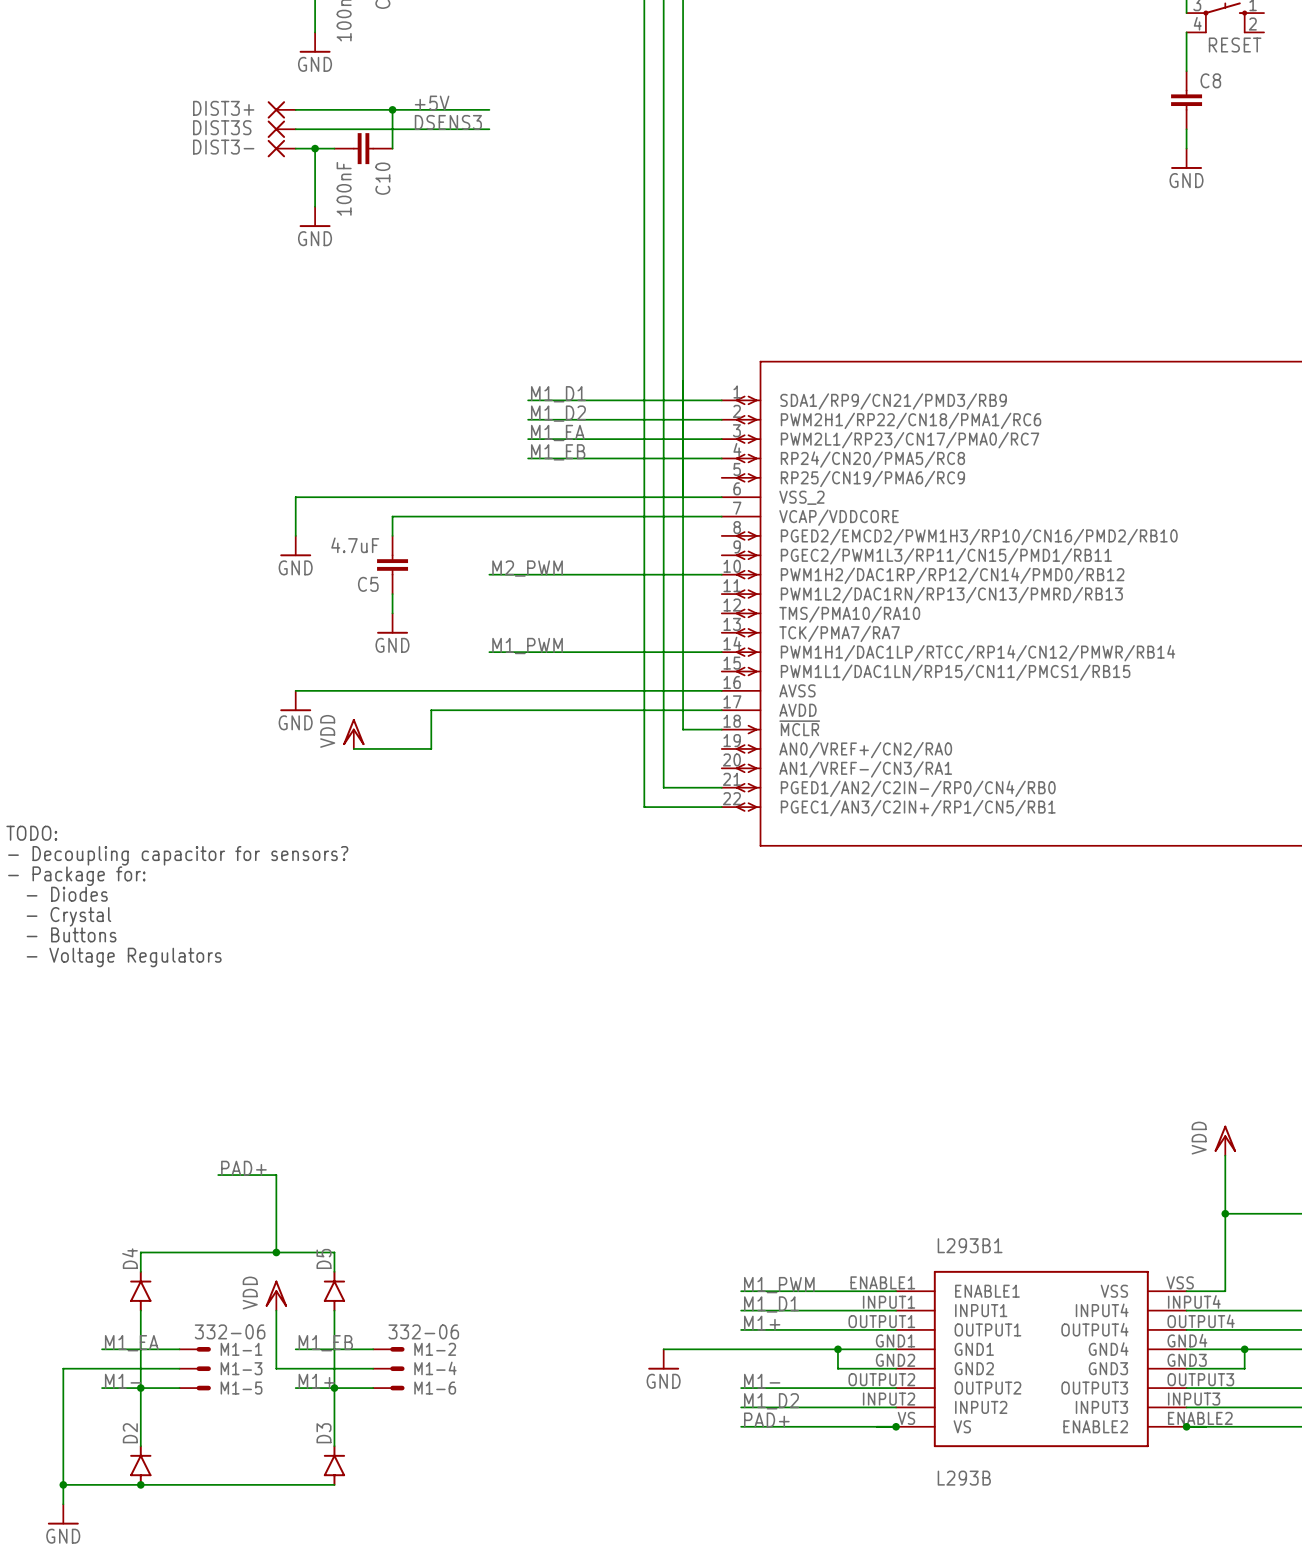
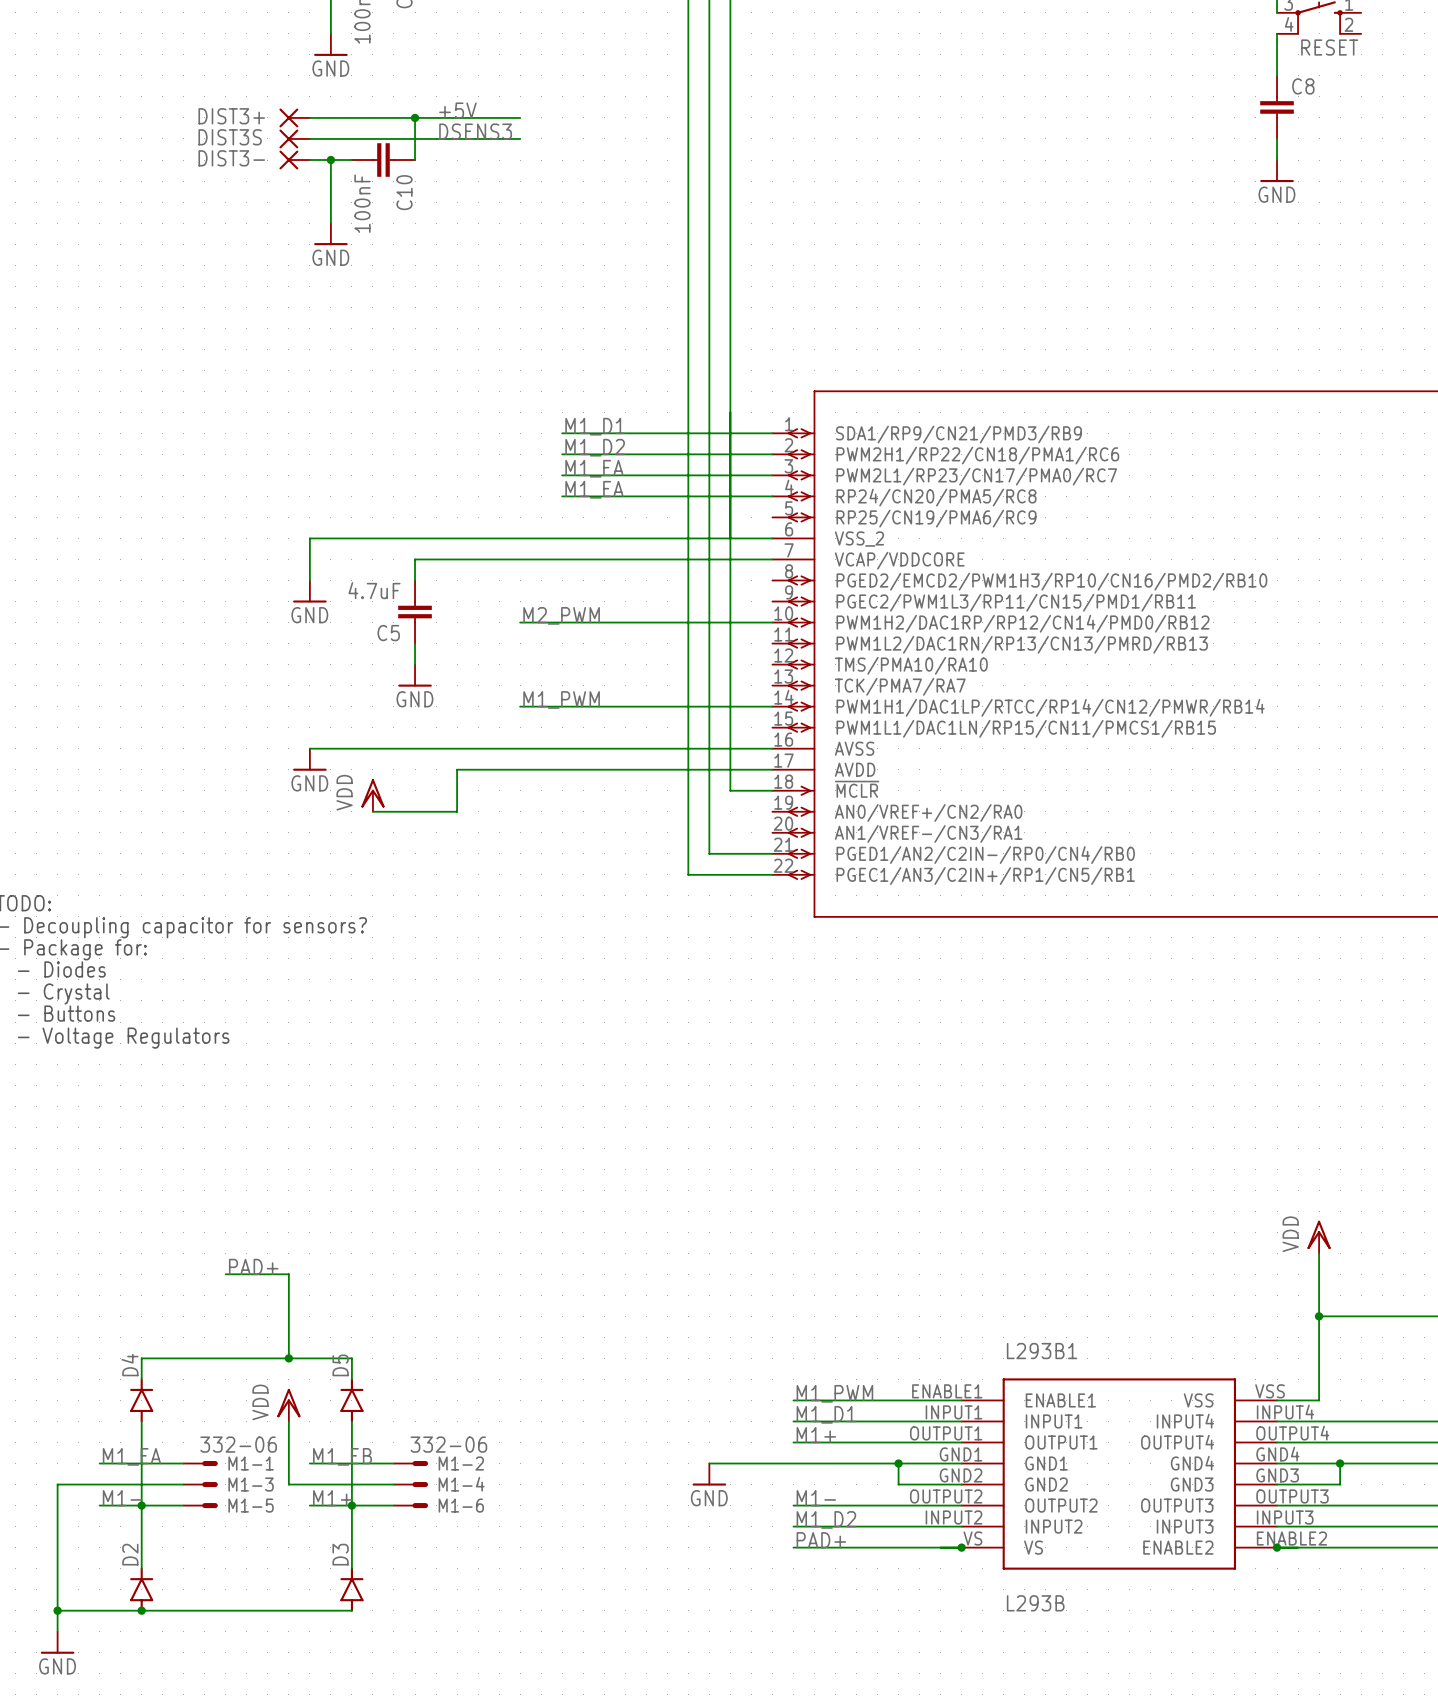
label: M1_EB (558, 452) -> M1_EA (594, 489)

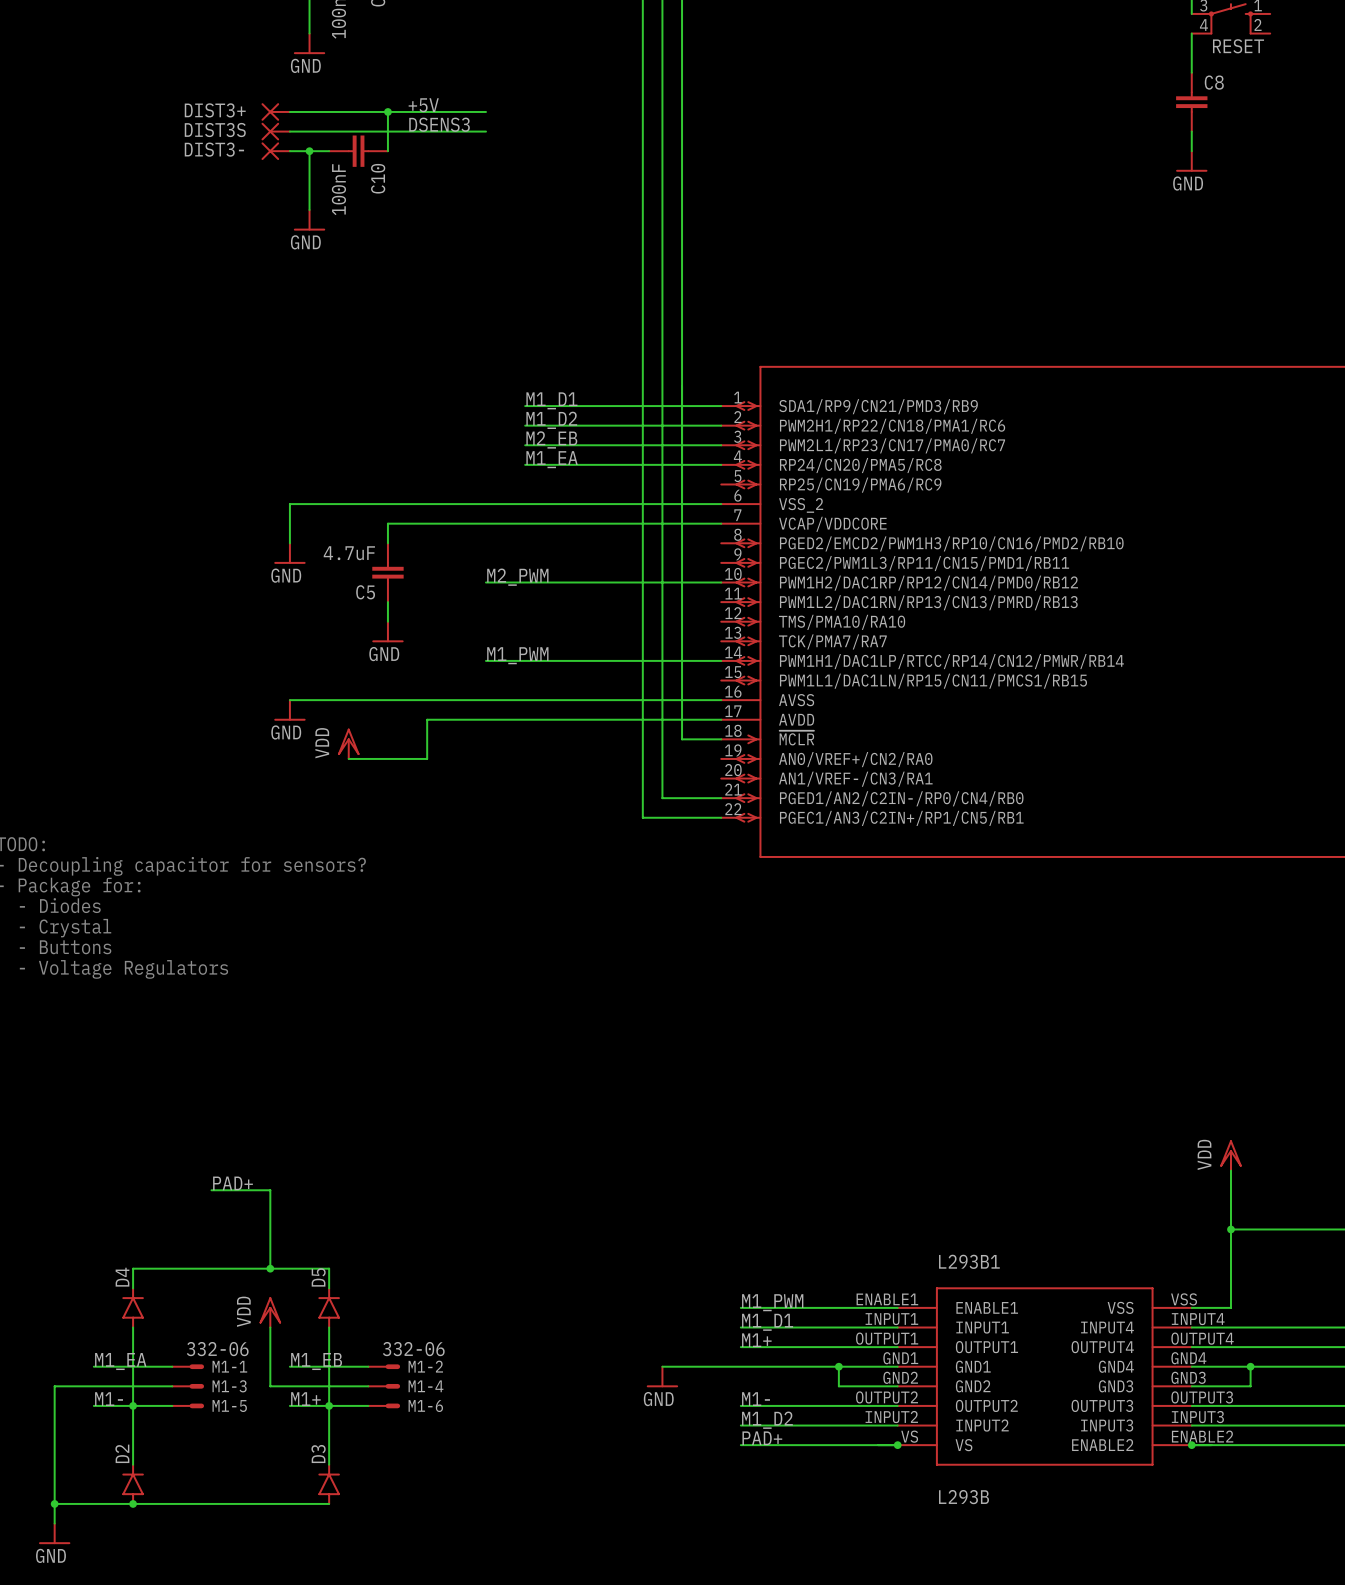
label: M1_EA (594, 468) -> M2_EB (551, 439)

